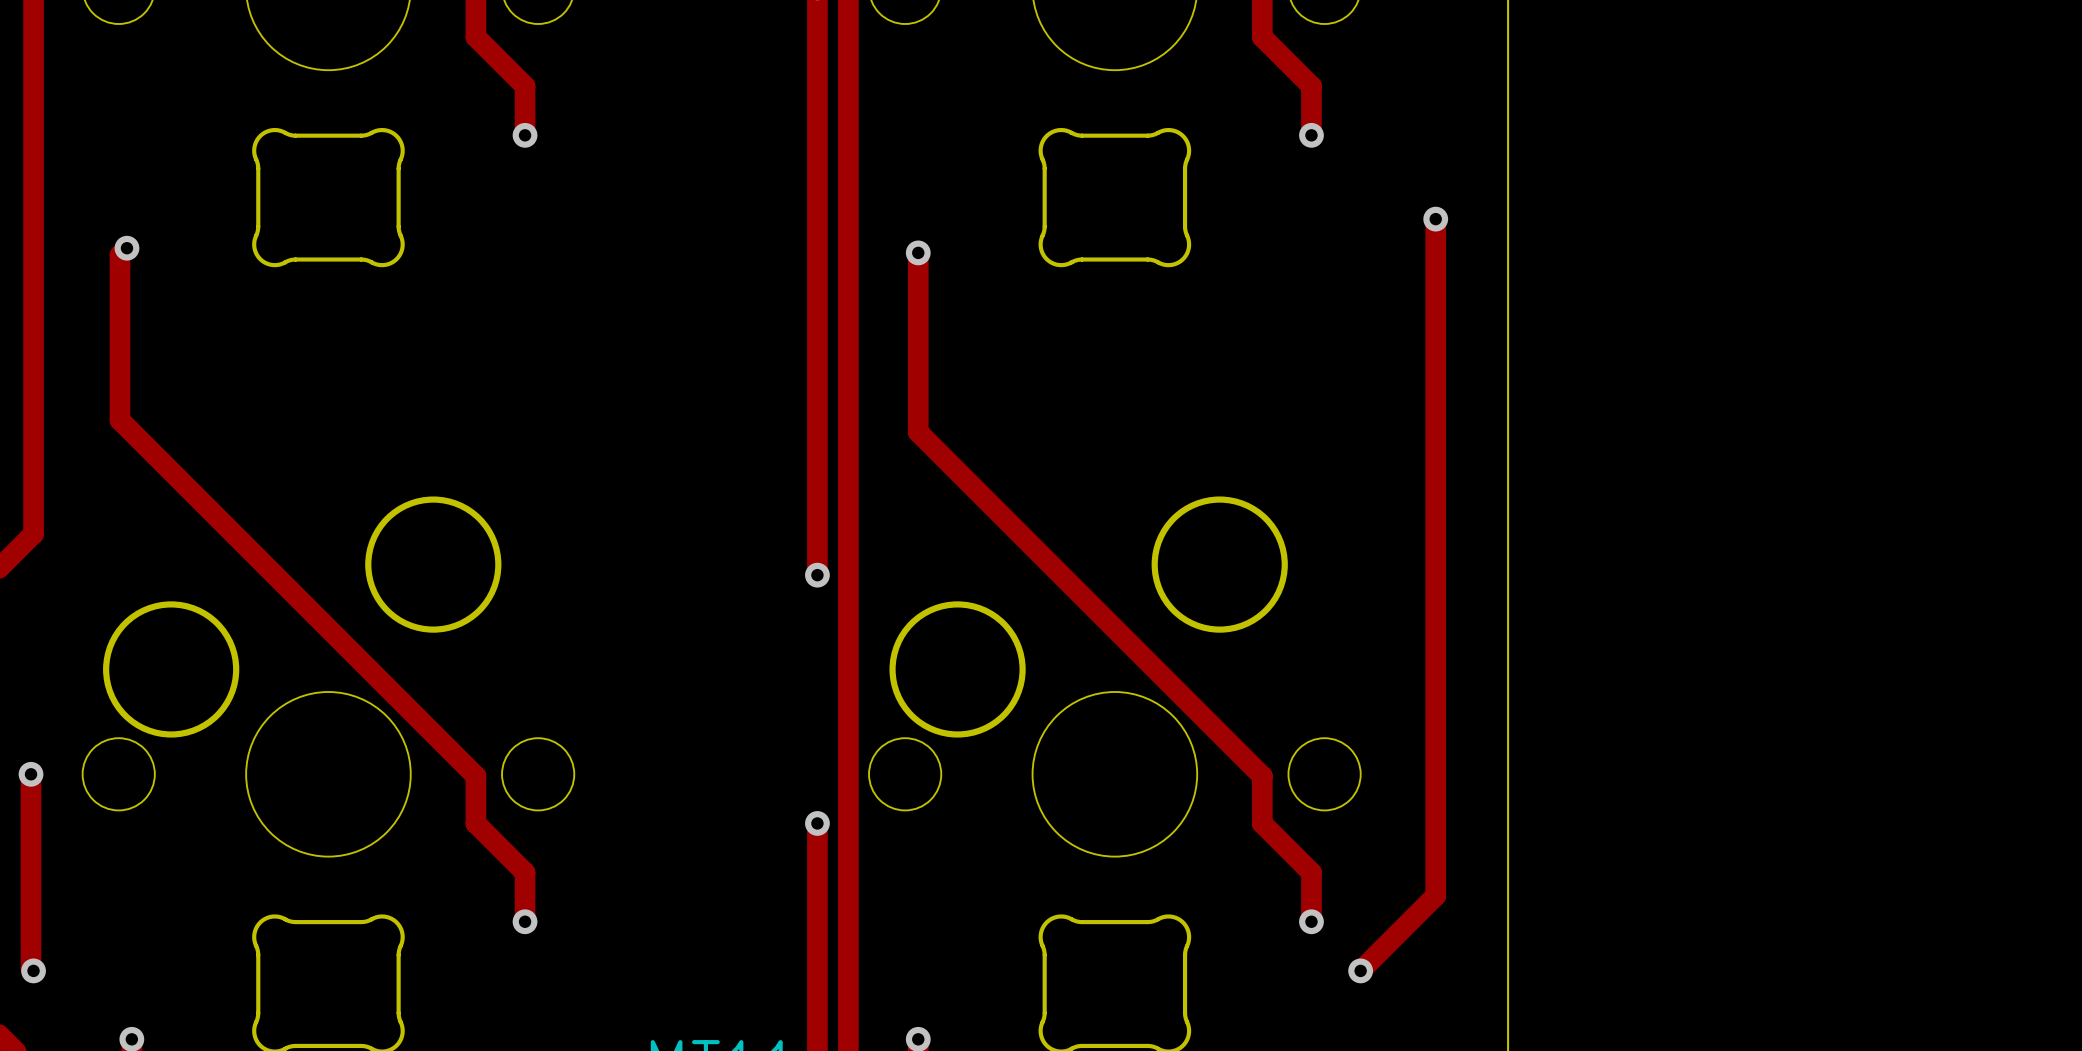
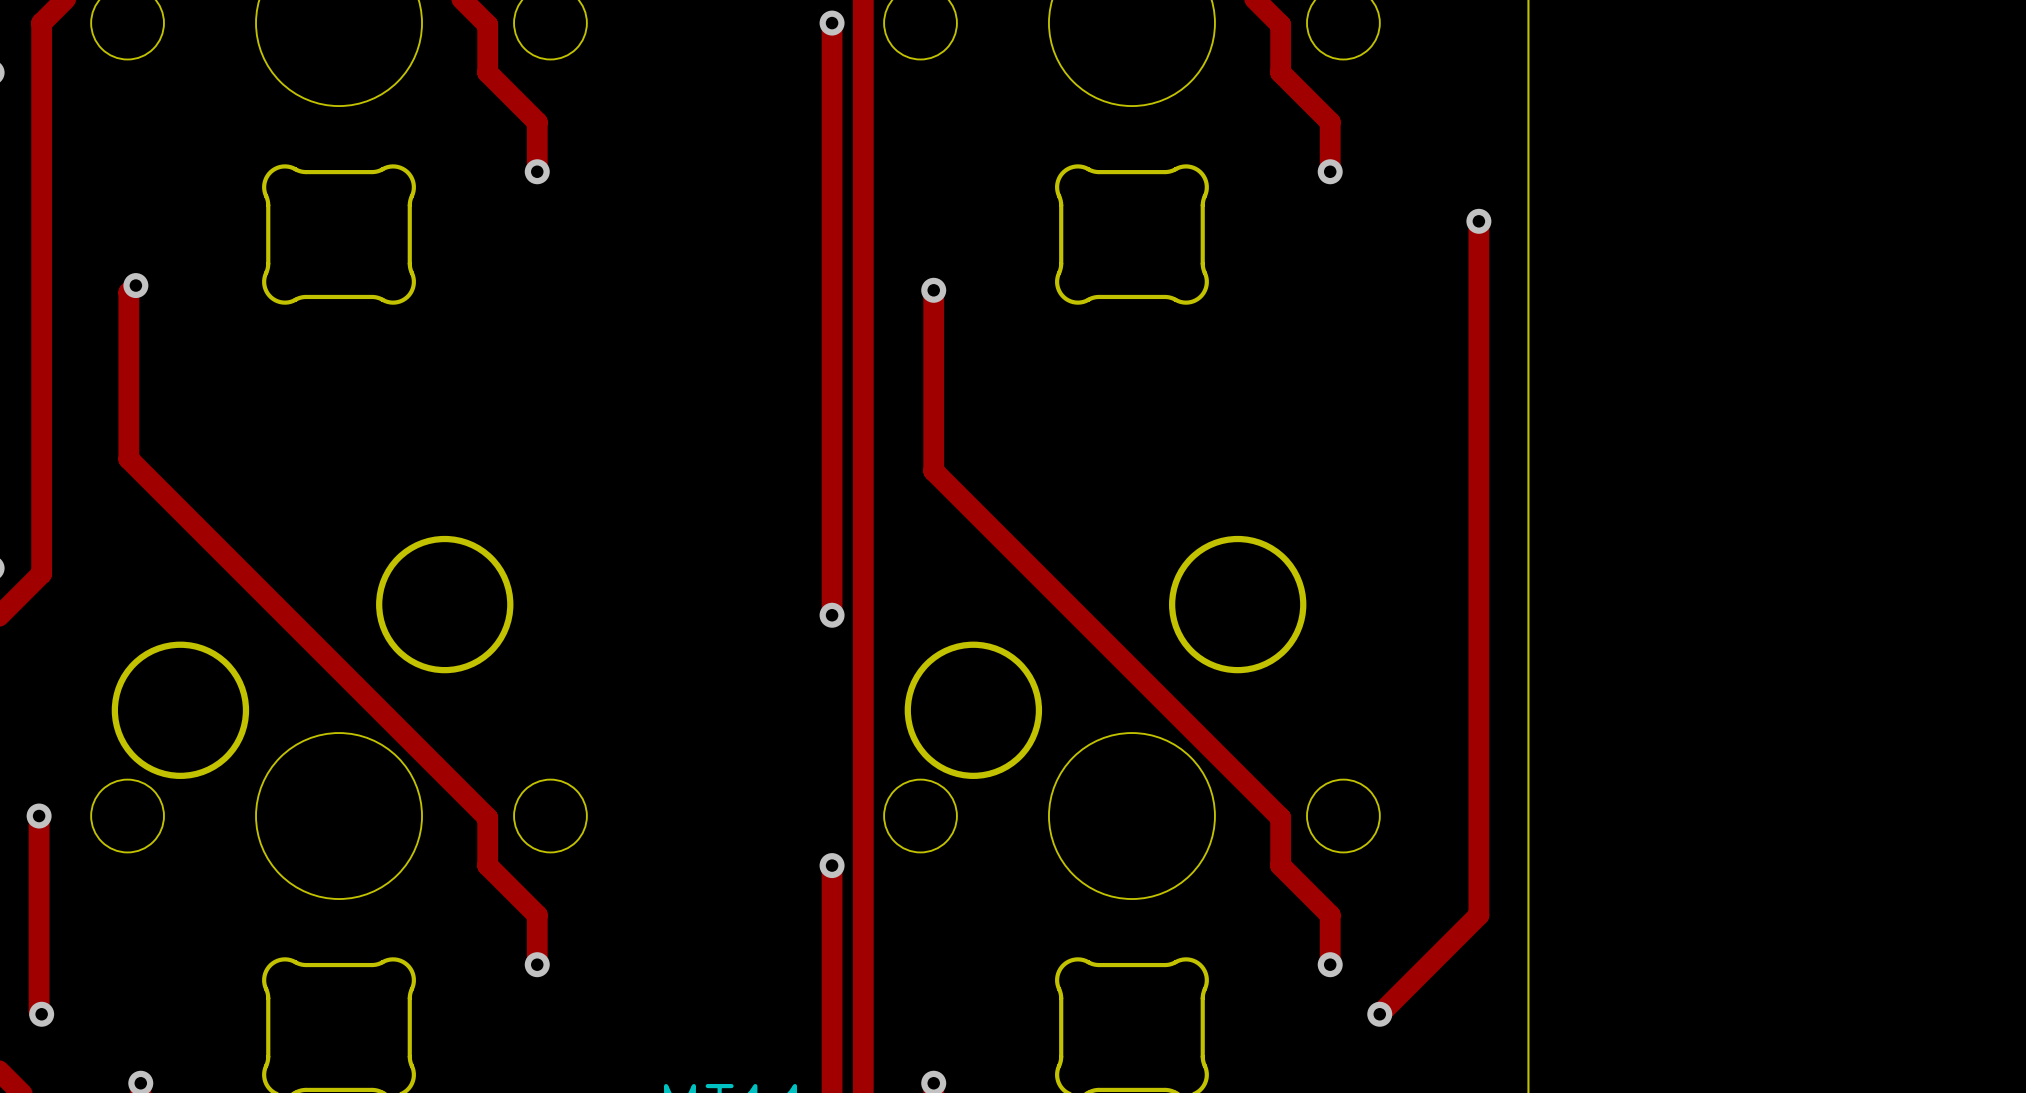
track: (1435, 219) (1435, 895) -> (1478, 221) (1478, 915) (1455, 938)
via position: (1435, 219) -> (1478, 221)

